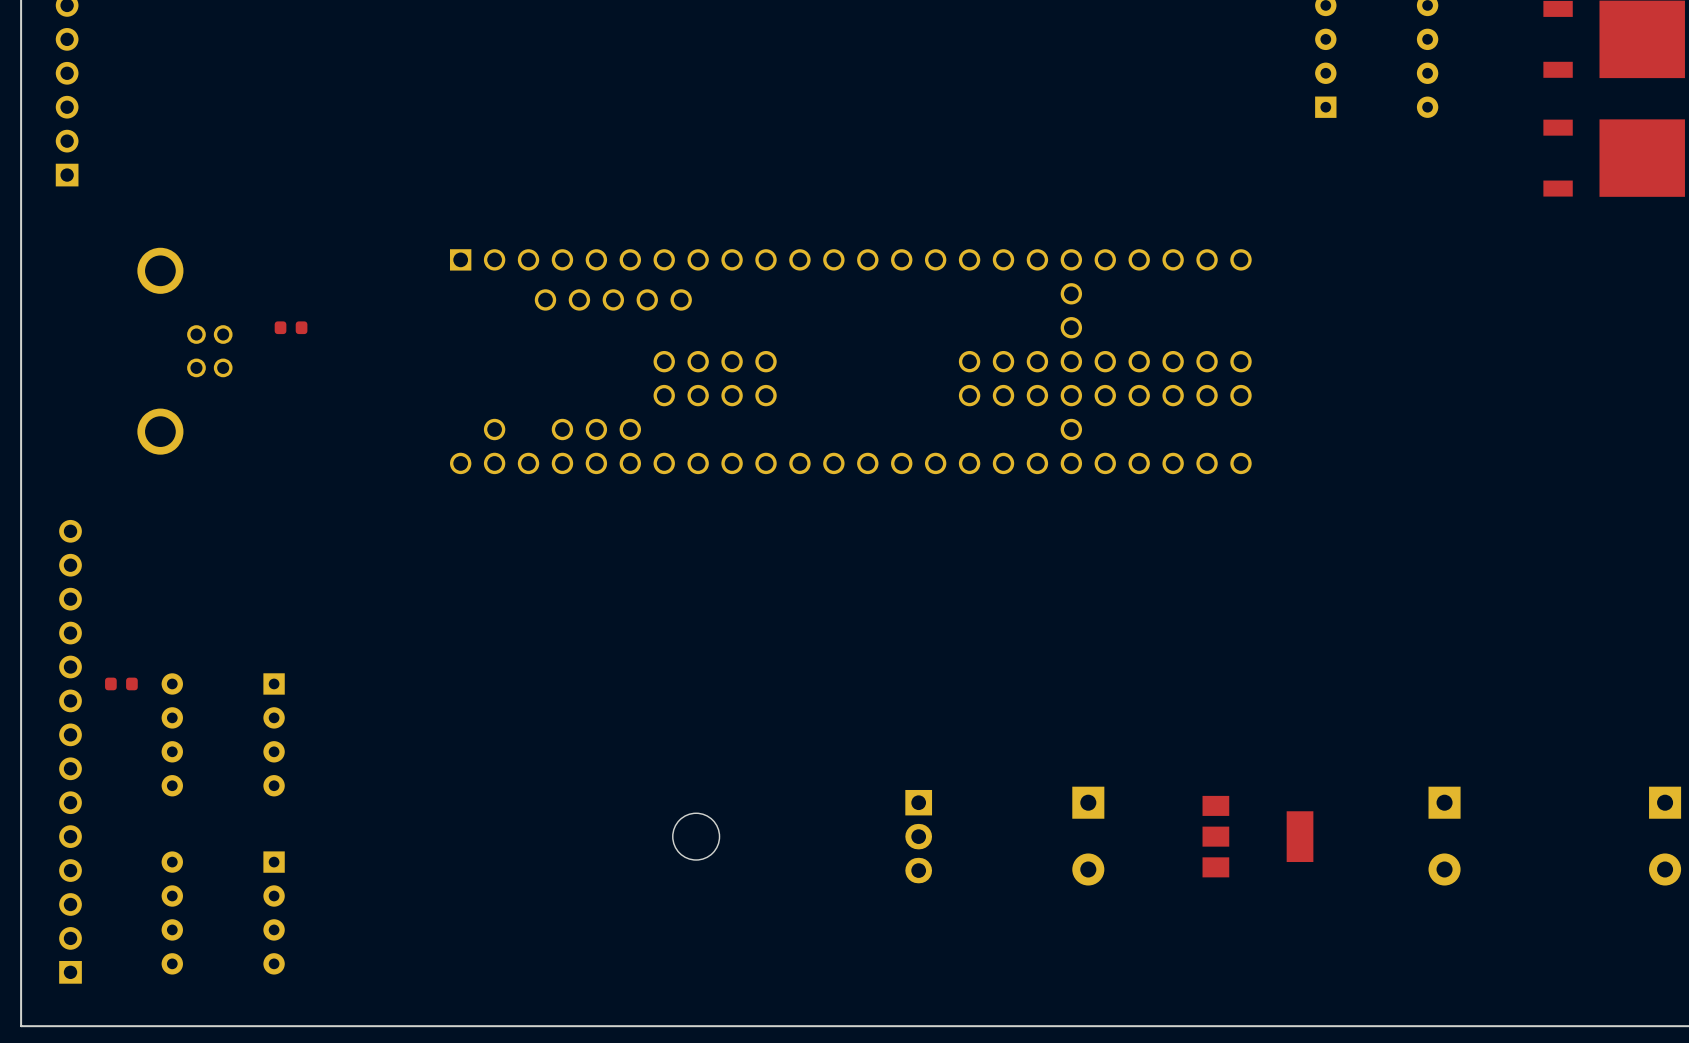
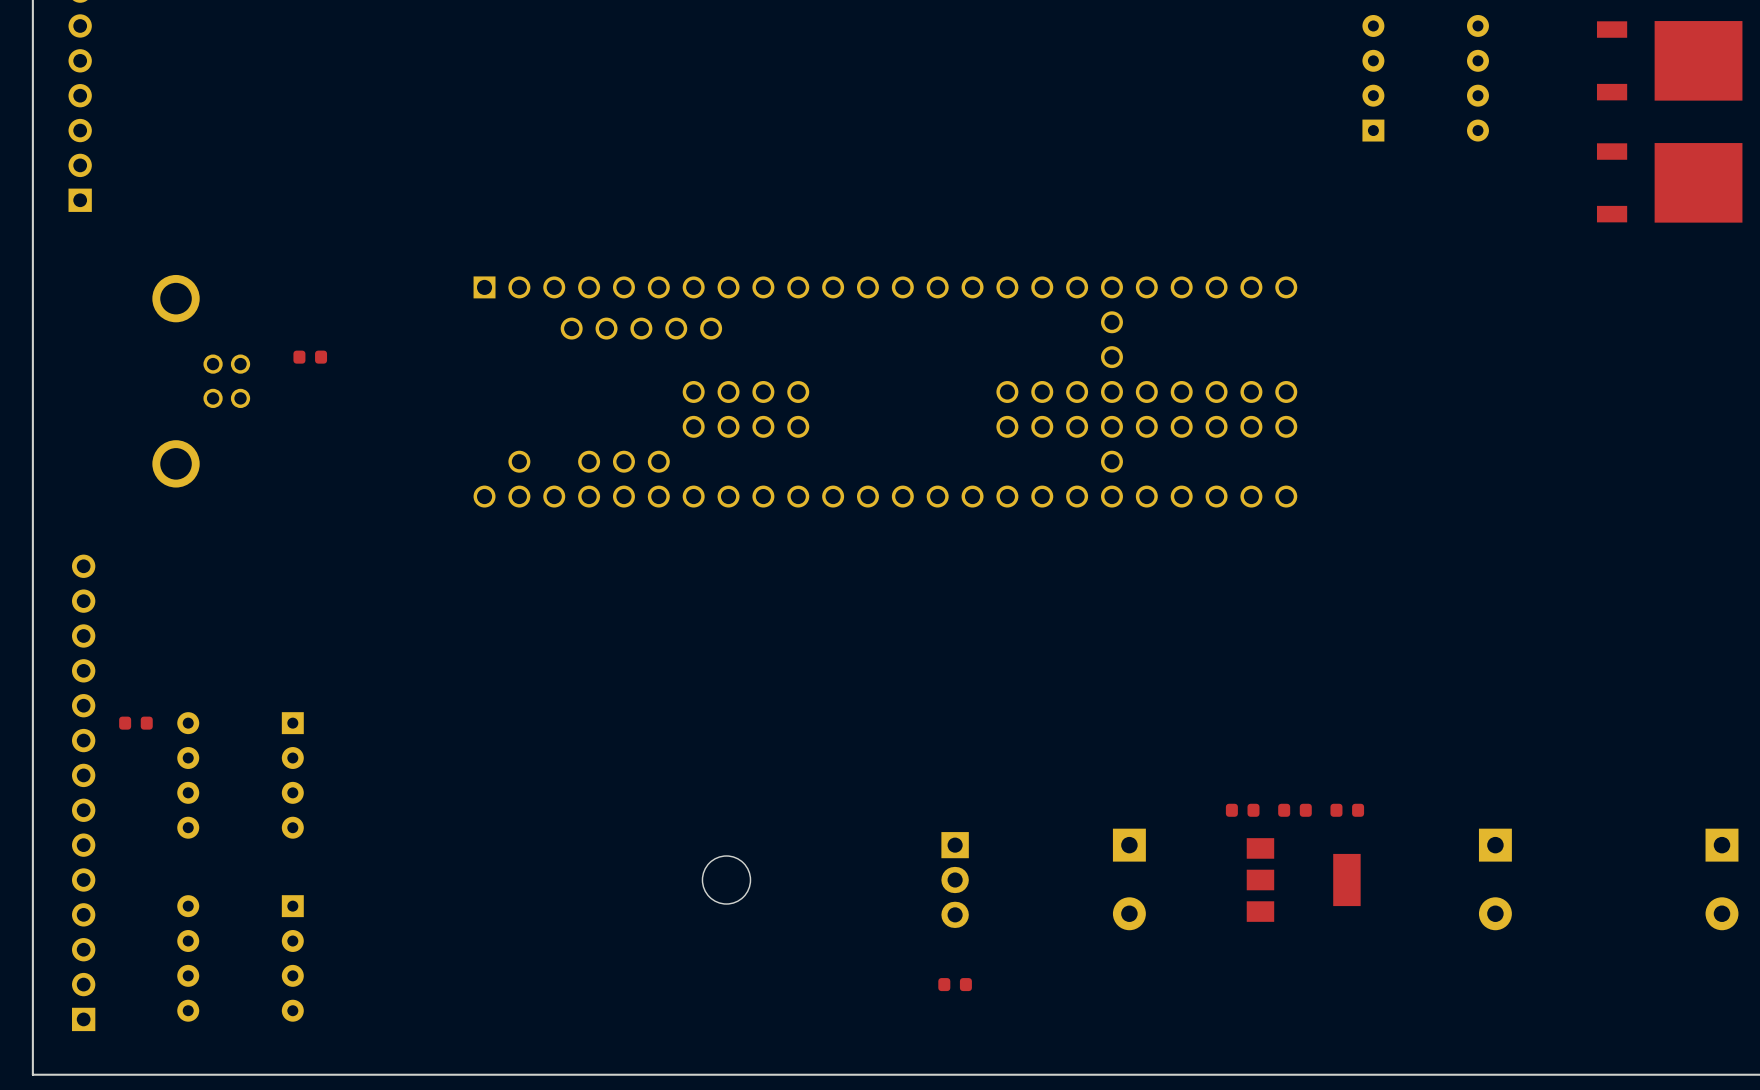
part: none -> (1242, 810)
part: none -> (1294, 810)
part: none -> (1347, 810)
part: none -> (955, 984)

